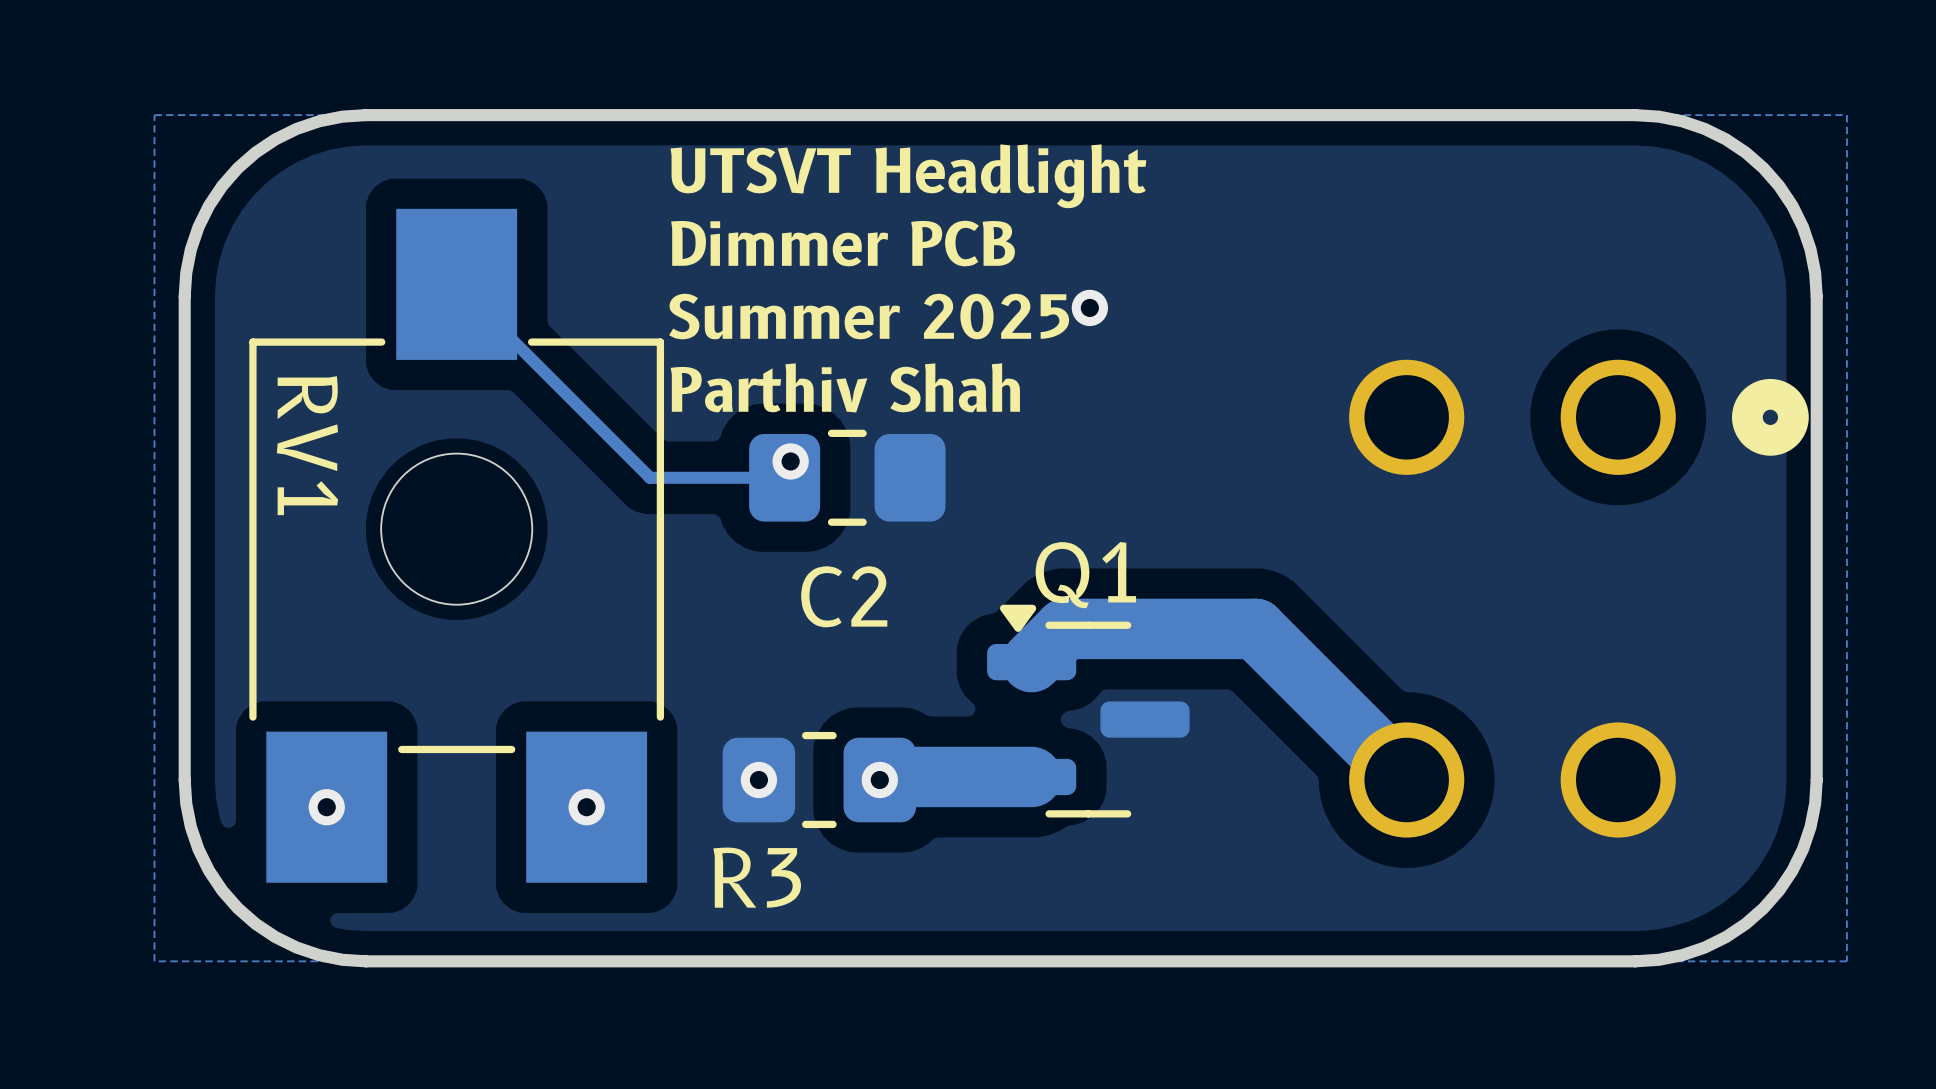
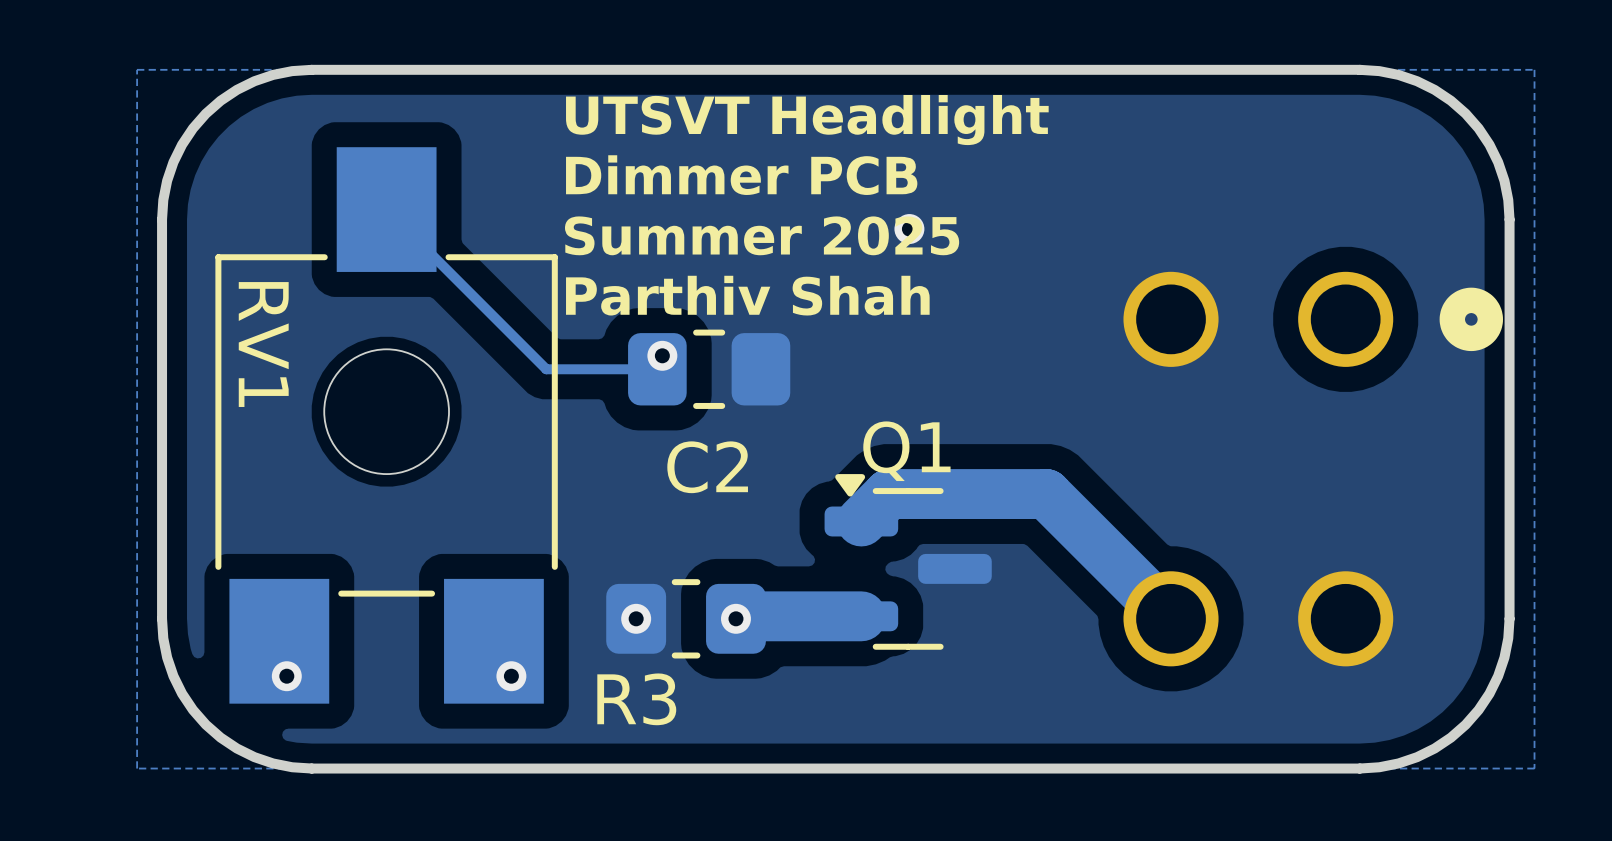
via position: (326, 807) -> (286, 676)
via position: (586, 807) -> (511, 676)

